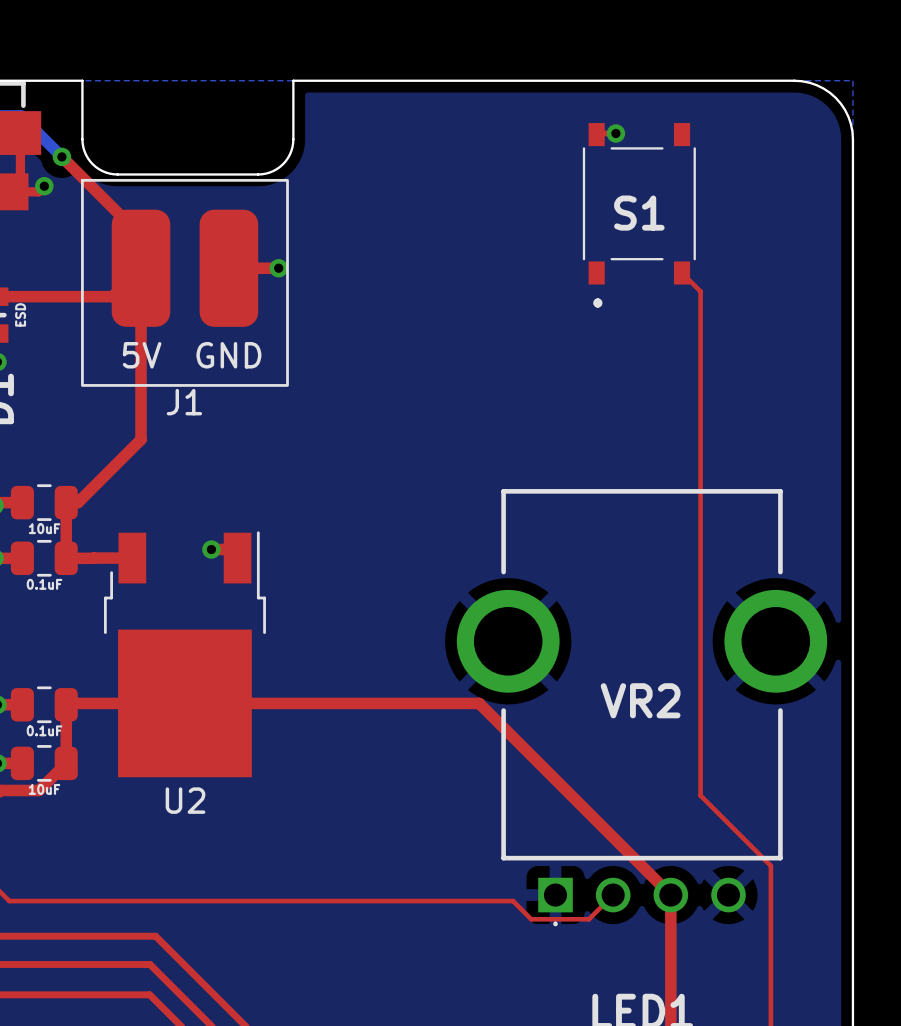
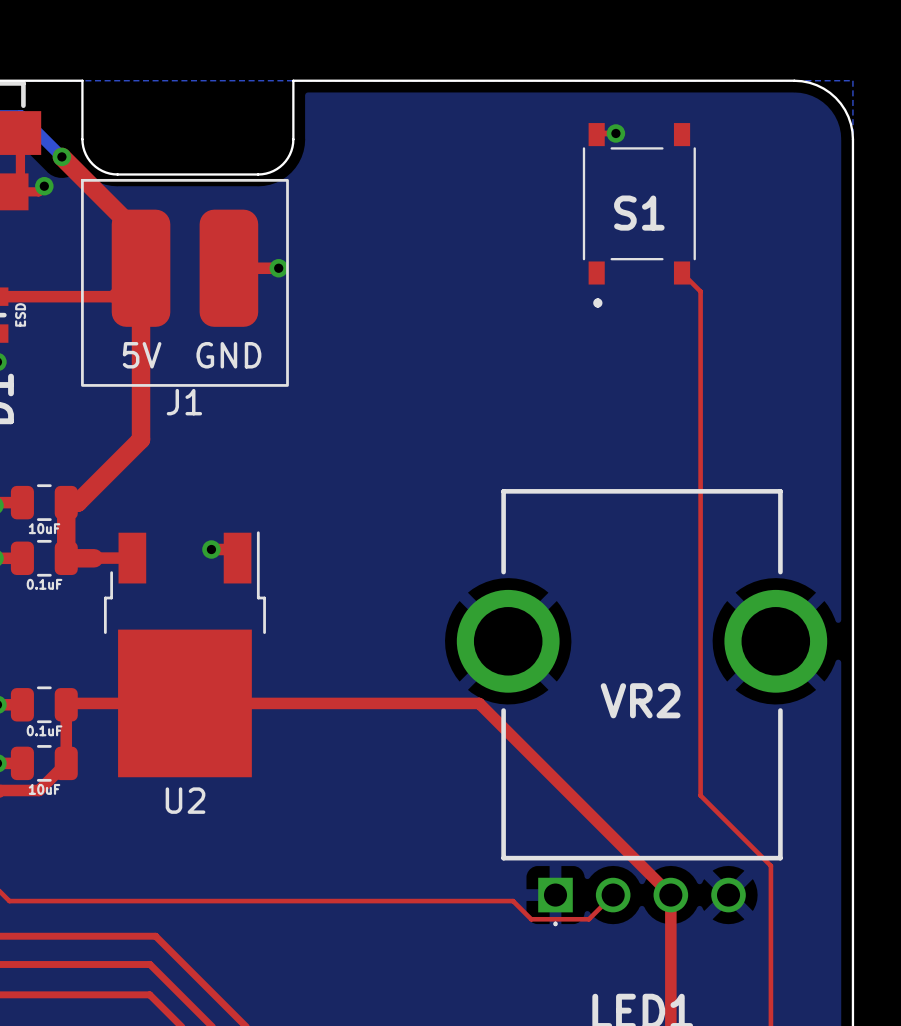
top track width: thin (61, 156) (141, 236) (141, 439) (77, 502) (66, 502) (66, 558) (94, 558) -> thick (61, 156) (141, 236) (141, 439) (77, 502) (66, 502) (66, 558) (94, 558)

